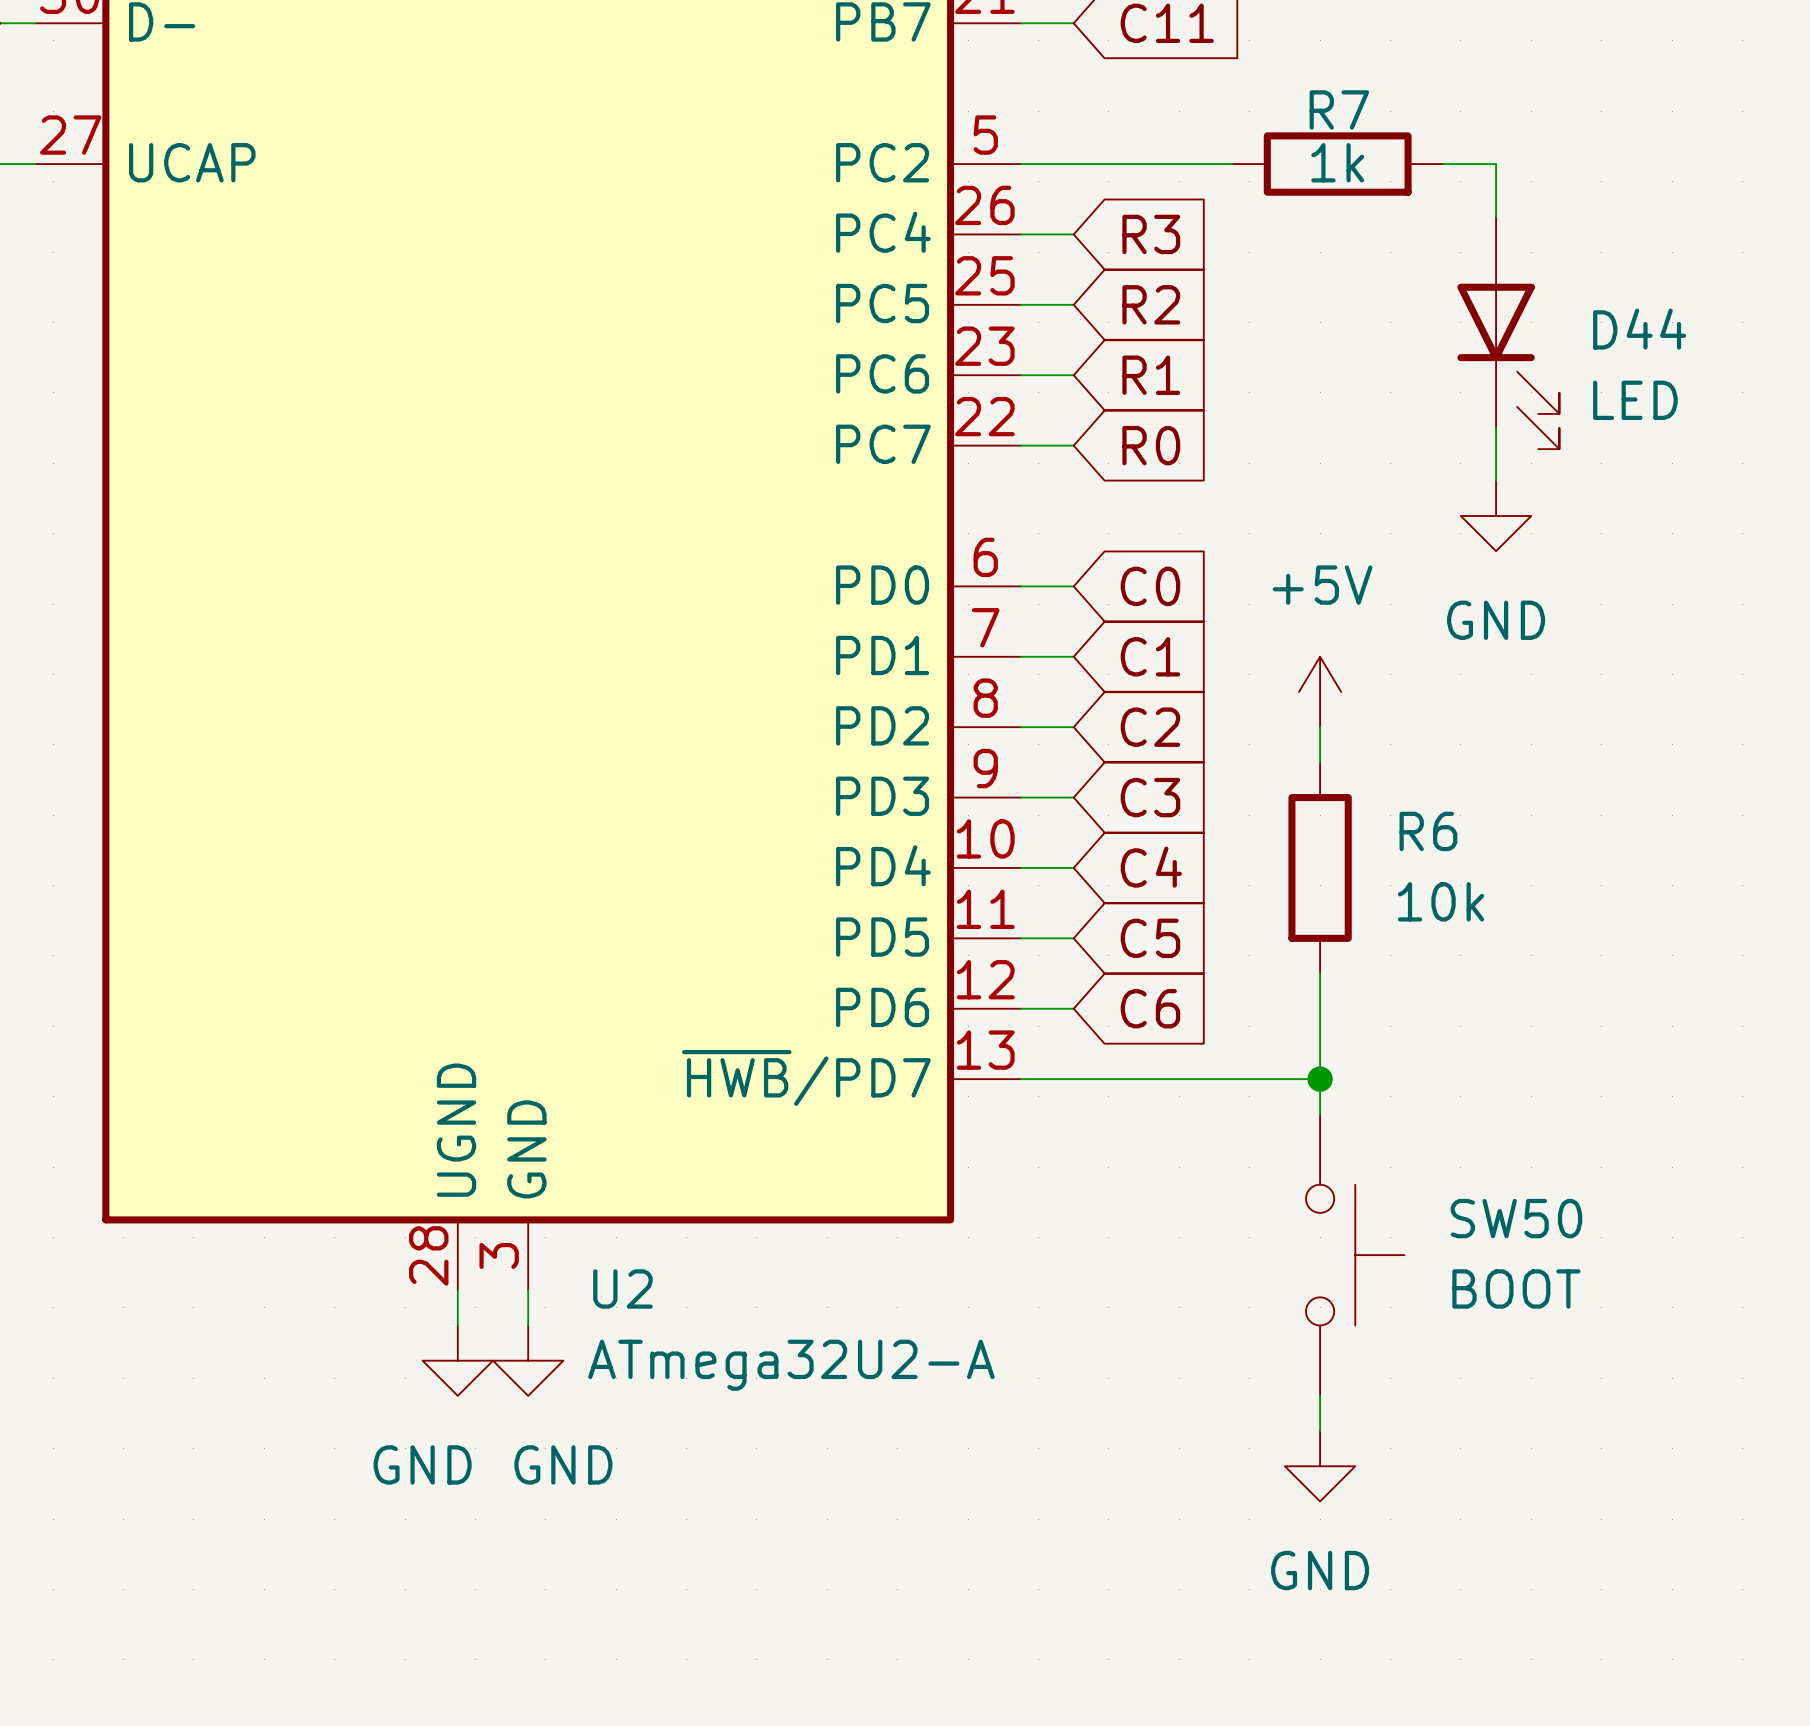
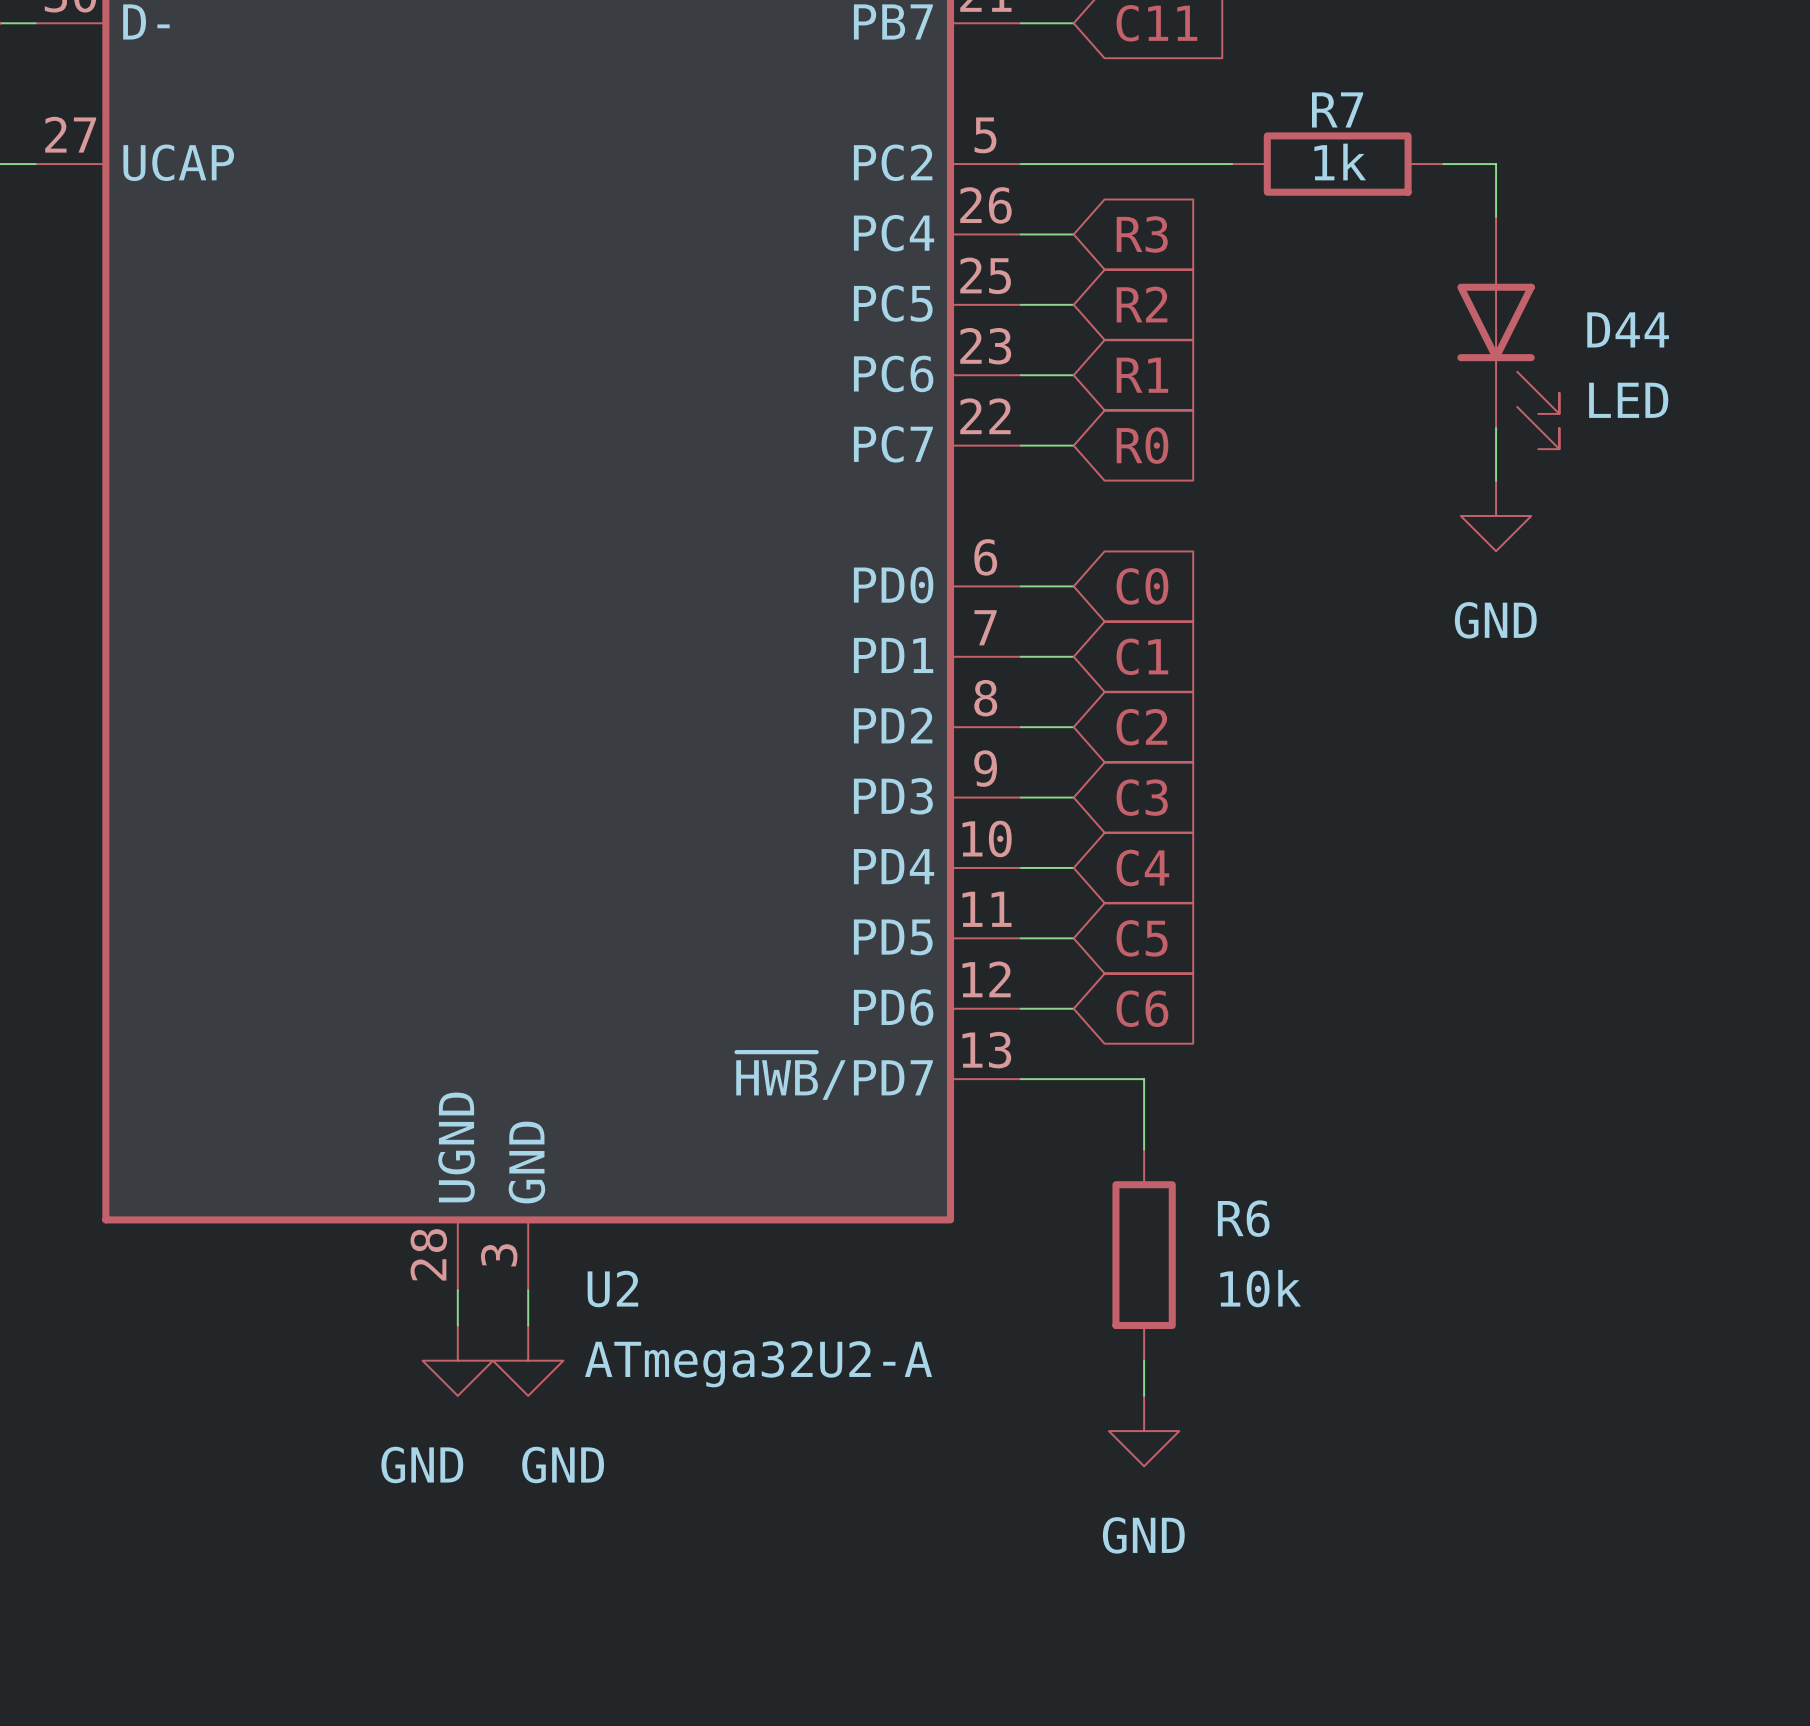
power symbol: +5V (1320, 691) -> none
wire: (1320, 727) (1320, 762) -> none
R6 position: (1320, 867) -> (1144, 1255)
wire: (1320, 973) (1320, 1114) -> none
wire: (1144, 1079) (1320, 1079) -> (1144, 1079) (1144, 1149)
junction: (1320, 1079) -> none
SW50: BOOT (1355, 1255) -> none
wire: (1320, 1395) (1320, 1431) -> (1144, 1360) (1144, 1395)
power symbol position: GND (1320, 1466) -> GND (1144, 1431)

